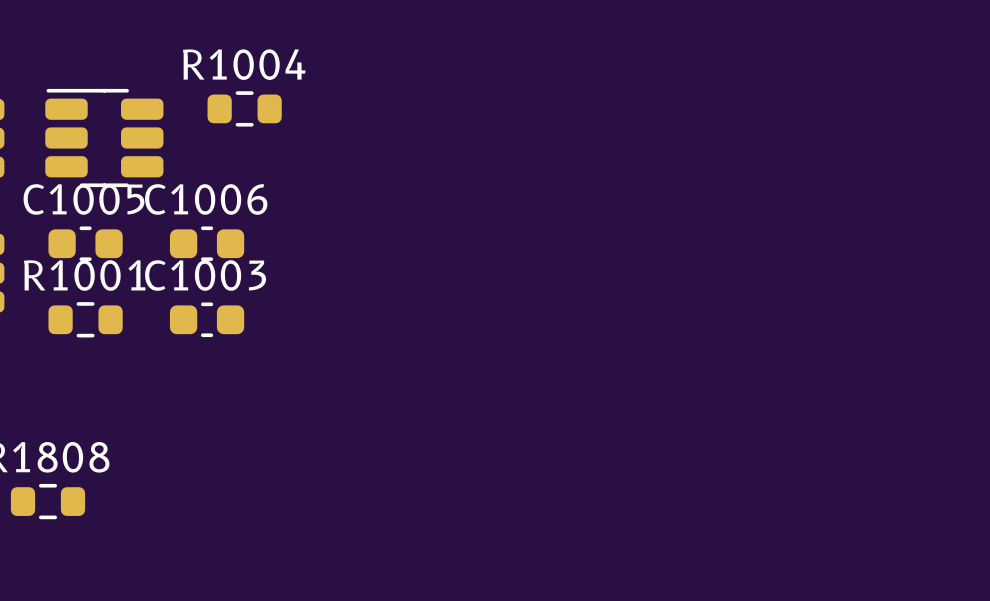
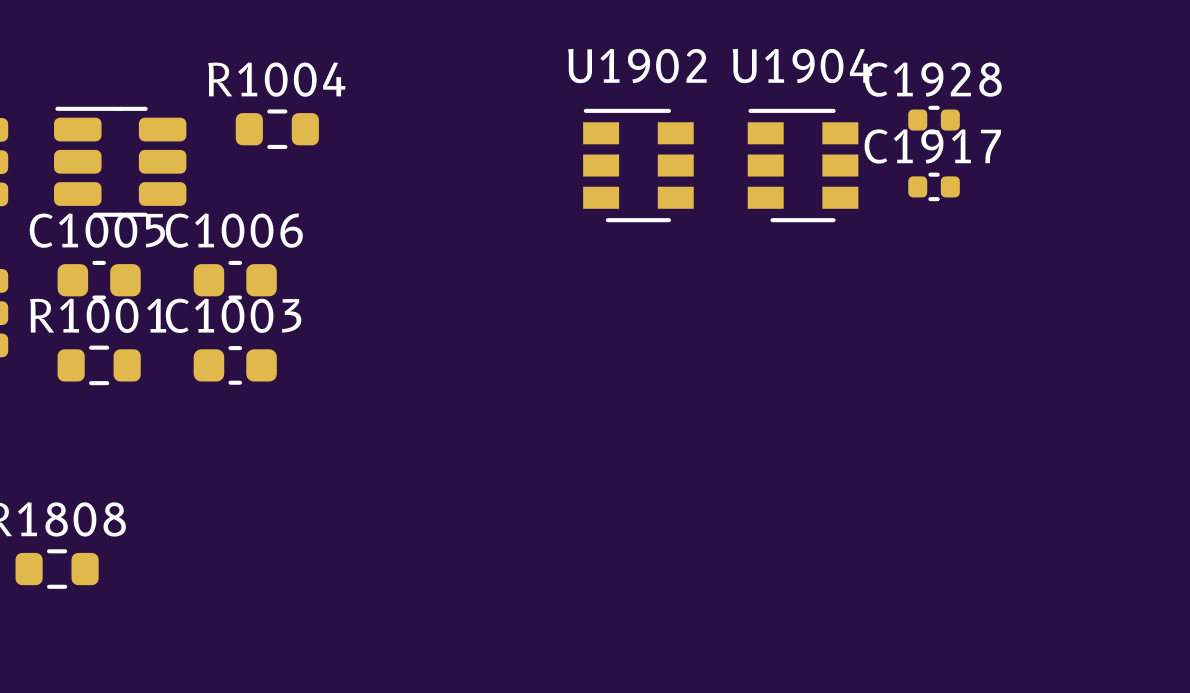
C1928: none -> (934, 120)
U1902: none -> (638, 165)
U1904: none -> (803, 165)
C1917: none -> (934, 186)

